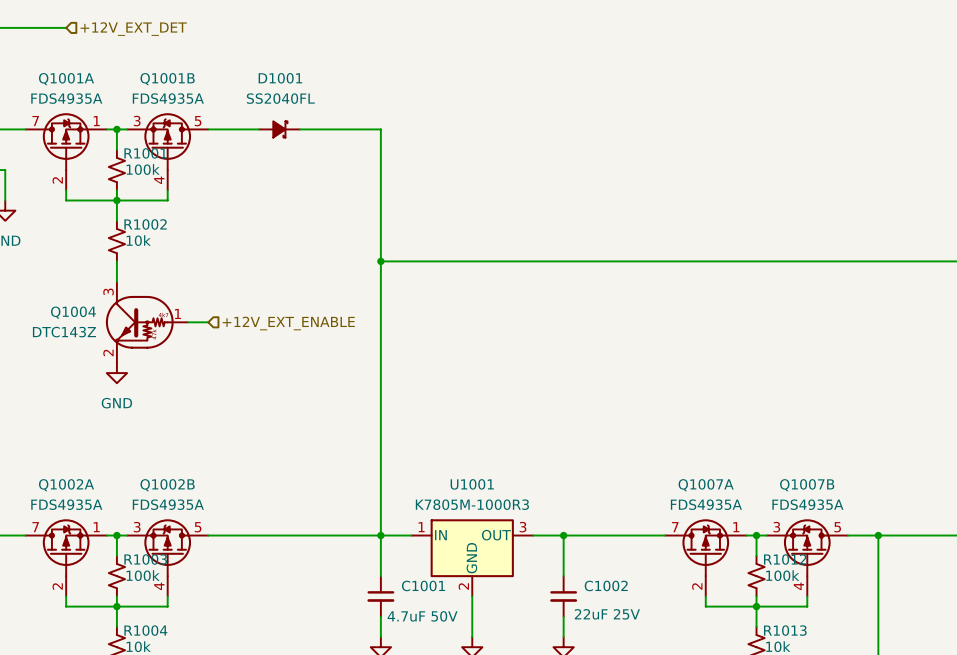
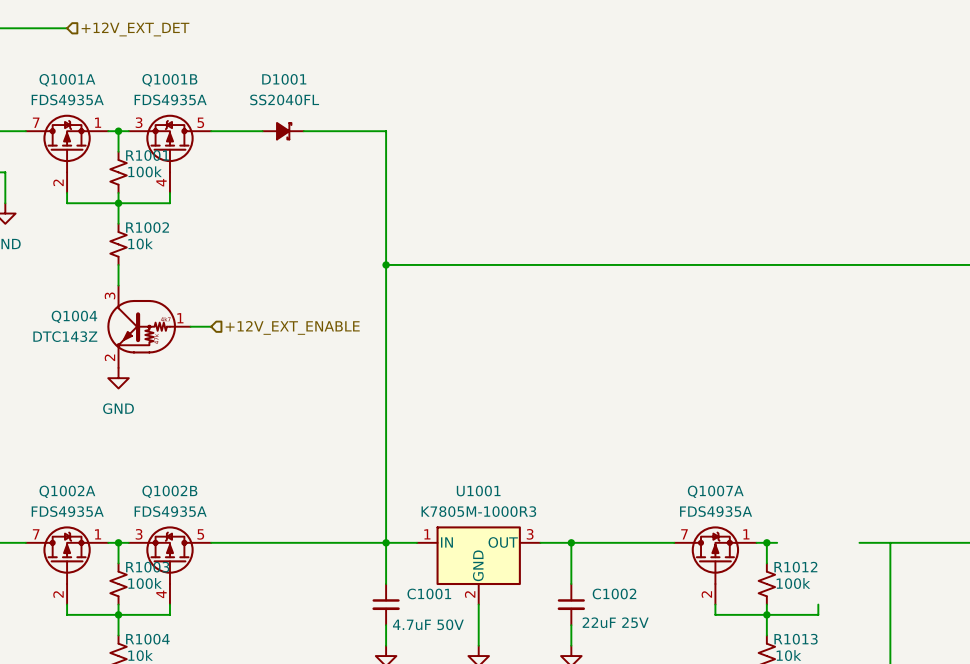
junction: (878, 535) -> none
Q1007B: FDS4935A (807, 557) -> none

